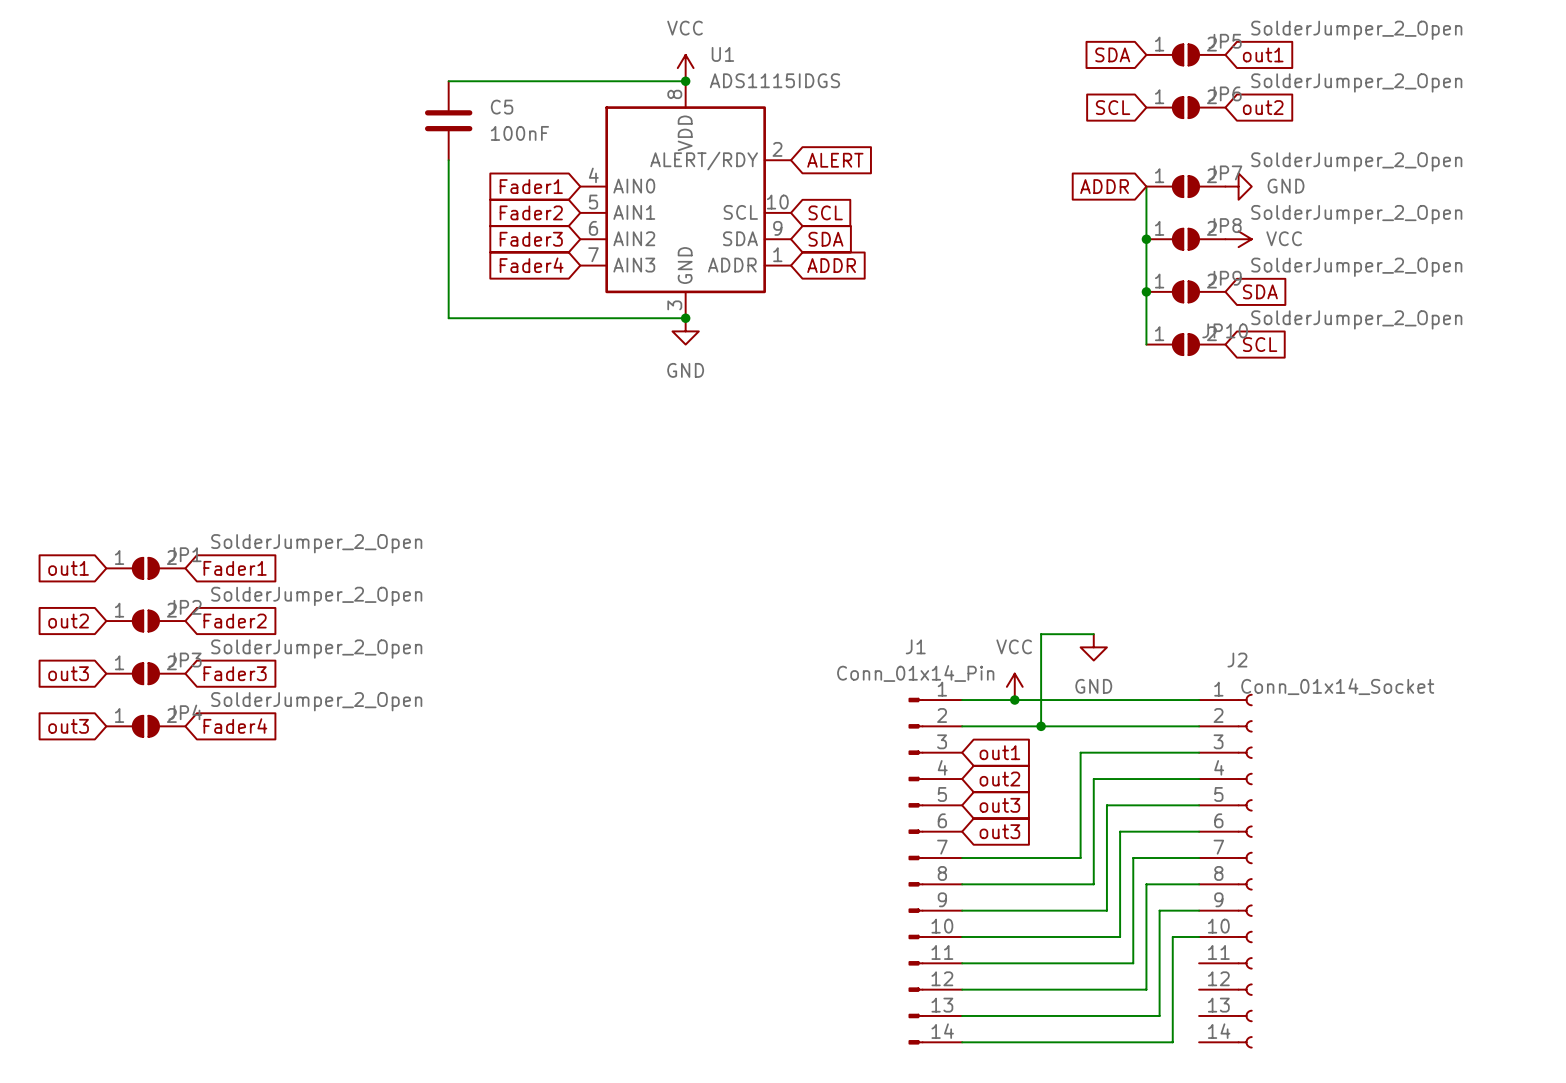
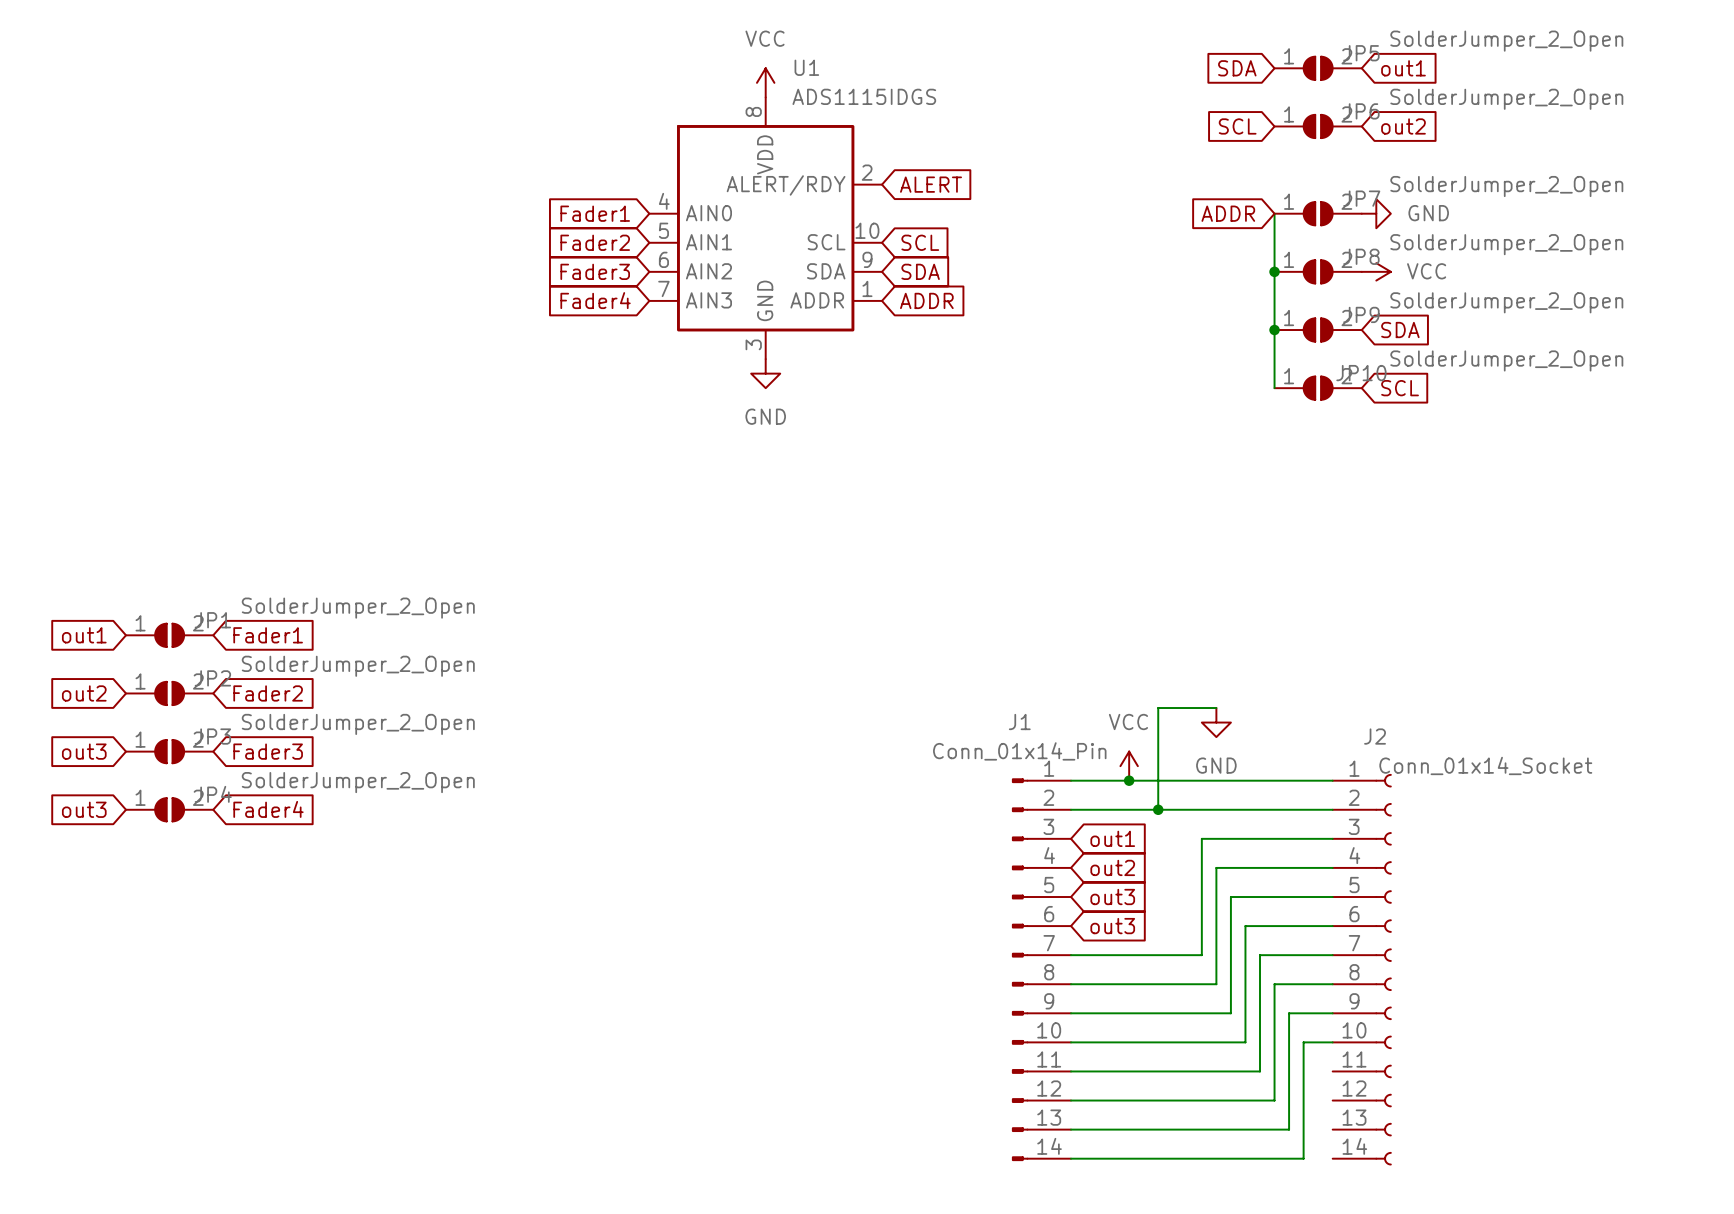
wire: (448, 81) (685, 81) -> none
junction: (685, 81) -> none
C5: 100nF (448, 120) -> none
wire: (448, 160) (448, 318) (685, 318) -> none
junction: (685, 318) -> none

